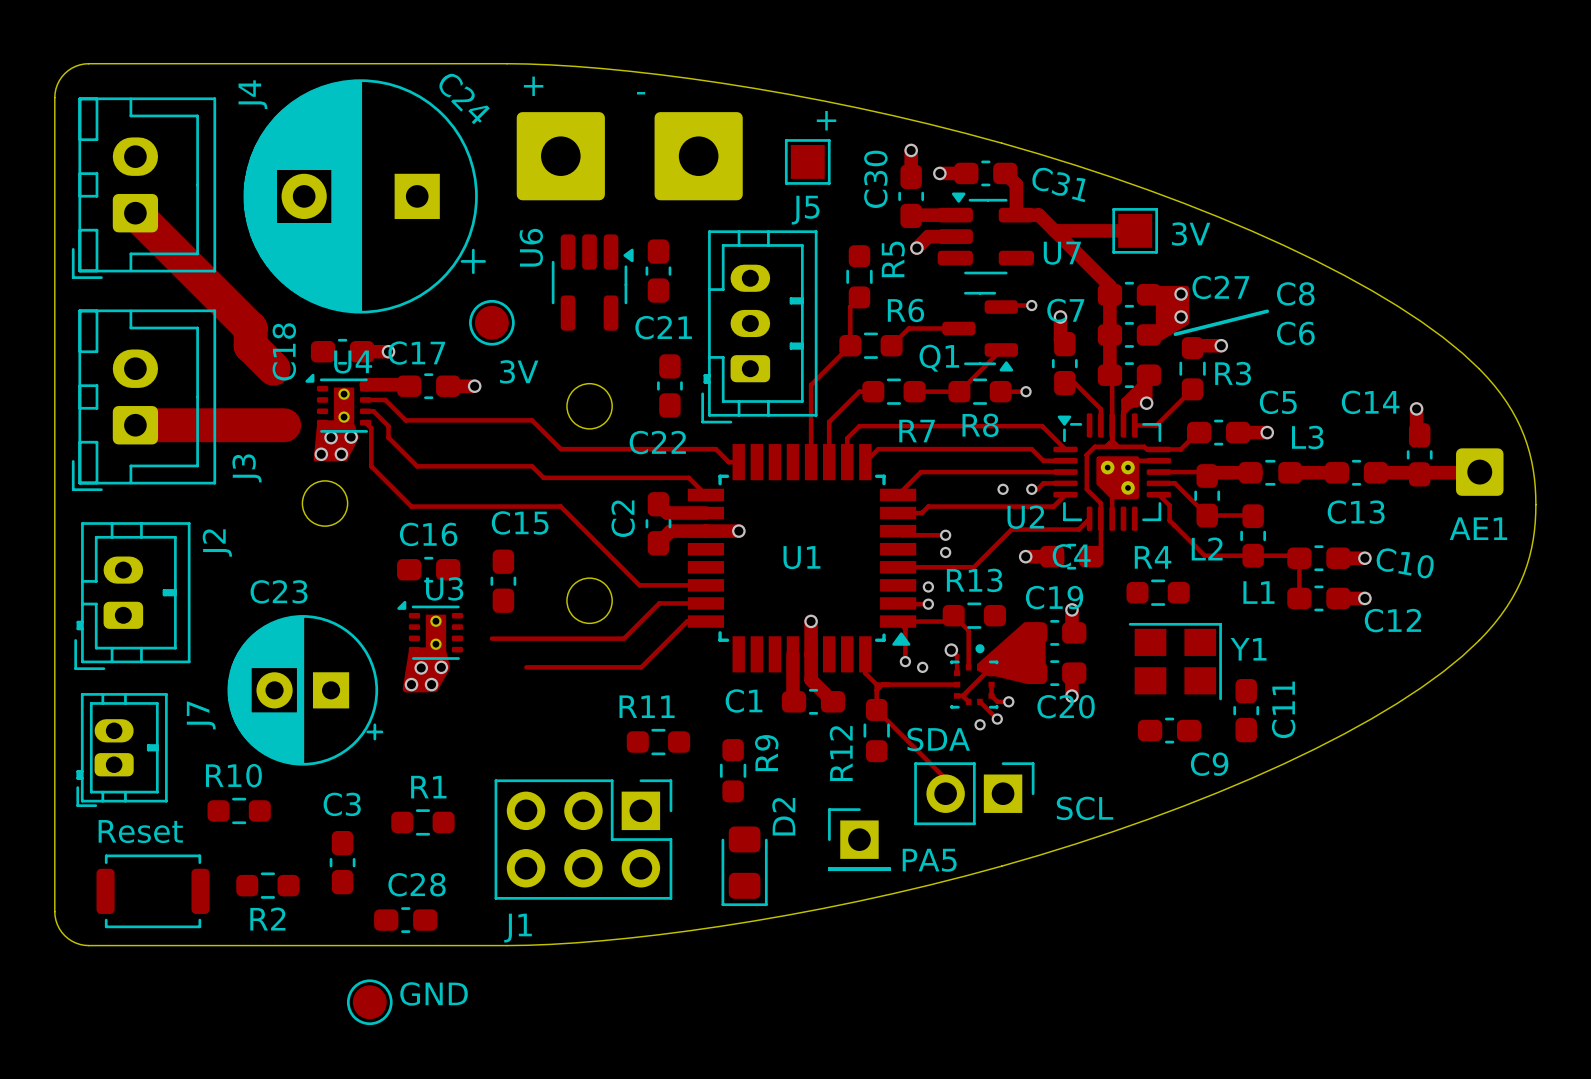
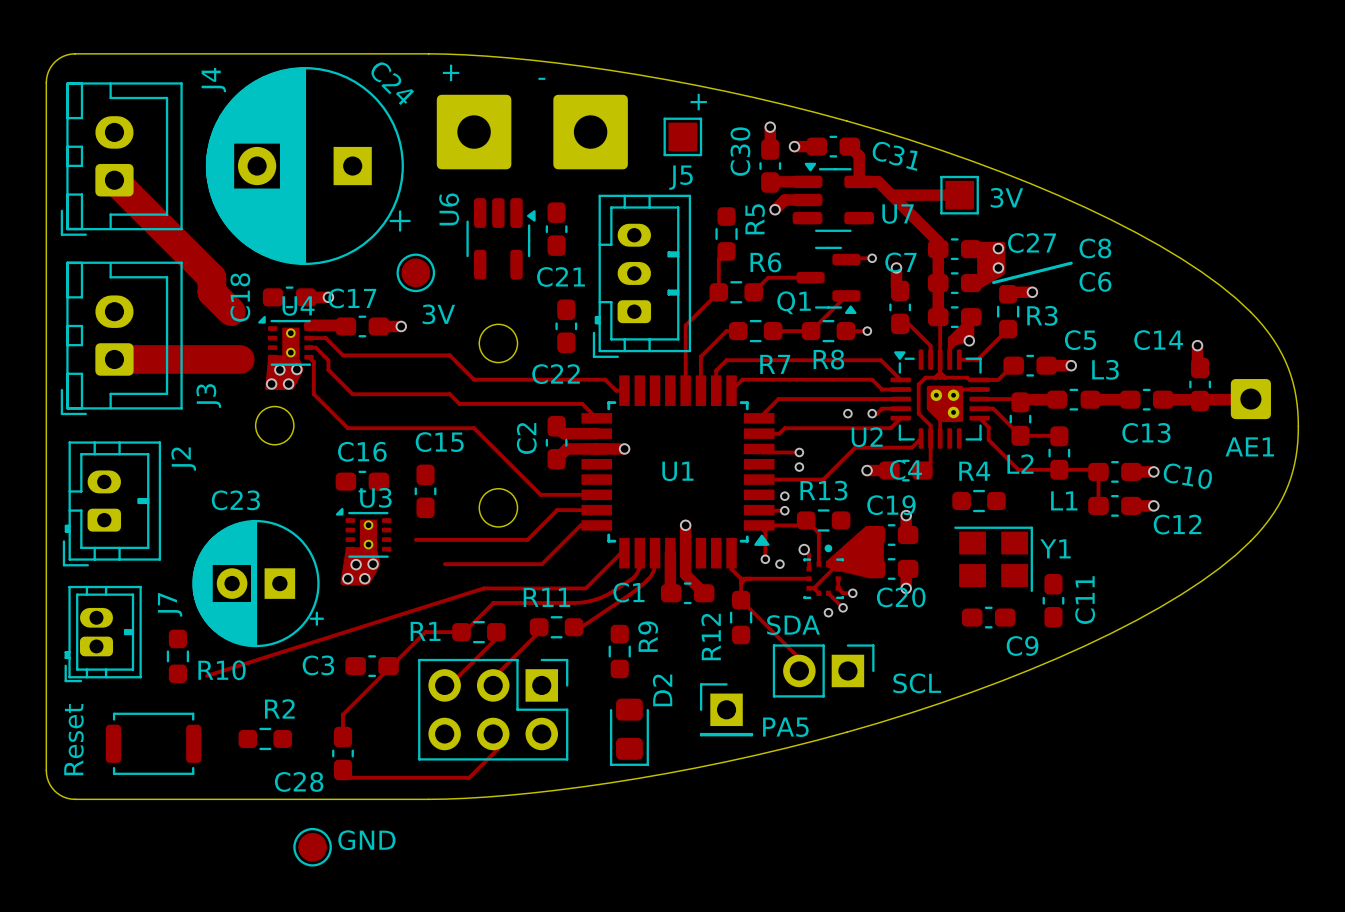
track: none -> (624, 553) (621, 553) (585, 588) (483, 588) (207, 675)
track: none -> (639, 553) (639, 568) (634, 576) (601, 597) (581, 602) (493, 602) (464, 632) (425, 632) (342, 714) (342, 737)
track: none -> (655, 553) (654, 568) (647, 580) (629, 594) (574, 632)
track: none -> (496, 632) (496, 638) (449, 685)
track: none -> (539, 632) (498, 673) (498, 685)
R1 name position: R1 (428, 787) -> R1 (425, 631)
C3 name position: C3 (342, 804) -> C3 (318, 665)
R10 rotation: 0° (239, 810) -> 90° clockwise (177, 656)
R10 position: (239, 810) -> (177, 656)
R1 position: (422, 822) -> (478, 632)
text rotation: 0° (140, 831) -> 90° counterclockwise (73, 739)
C3 rotation: 0° (342, 862) -> 90° clockwise (372, 666)
C3 position: (342, 862) -> (372, 666)
track: none -> (498, 733) (498, 748) (469, 777) (350, 777) (342, 769)
C28 name position: C28 (417, 884) -> C28 (299, 781)
R2 position: (267, 885) -> (265, 738)
part position: (153, 891) -> (153, 743)
R2 name position: R2 (267, 919) -> R2 (279, 708)
C28 rotation: 0° (405, 920) -> 90° clockwise (342, 753)
J1 name: J1 (518, 928) -> none

